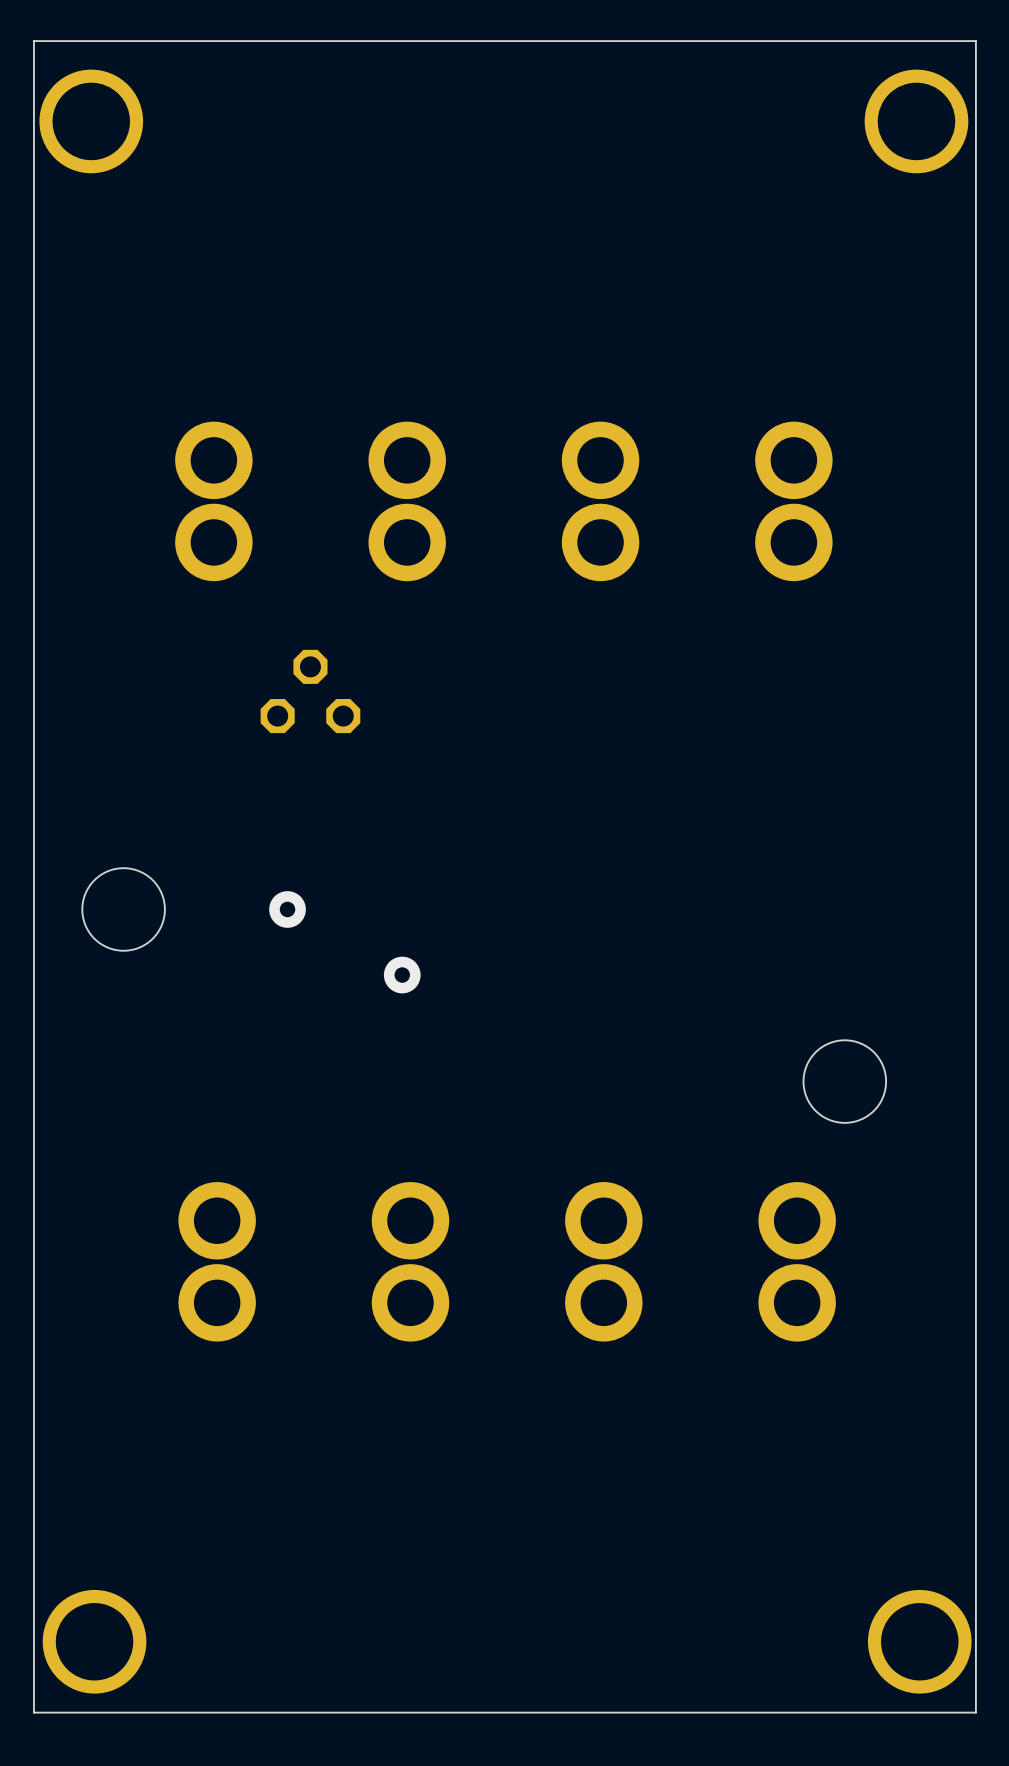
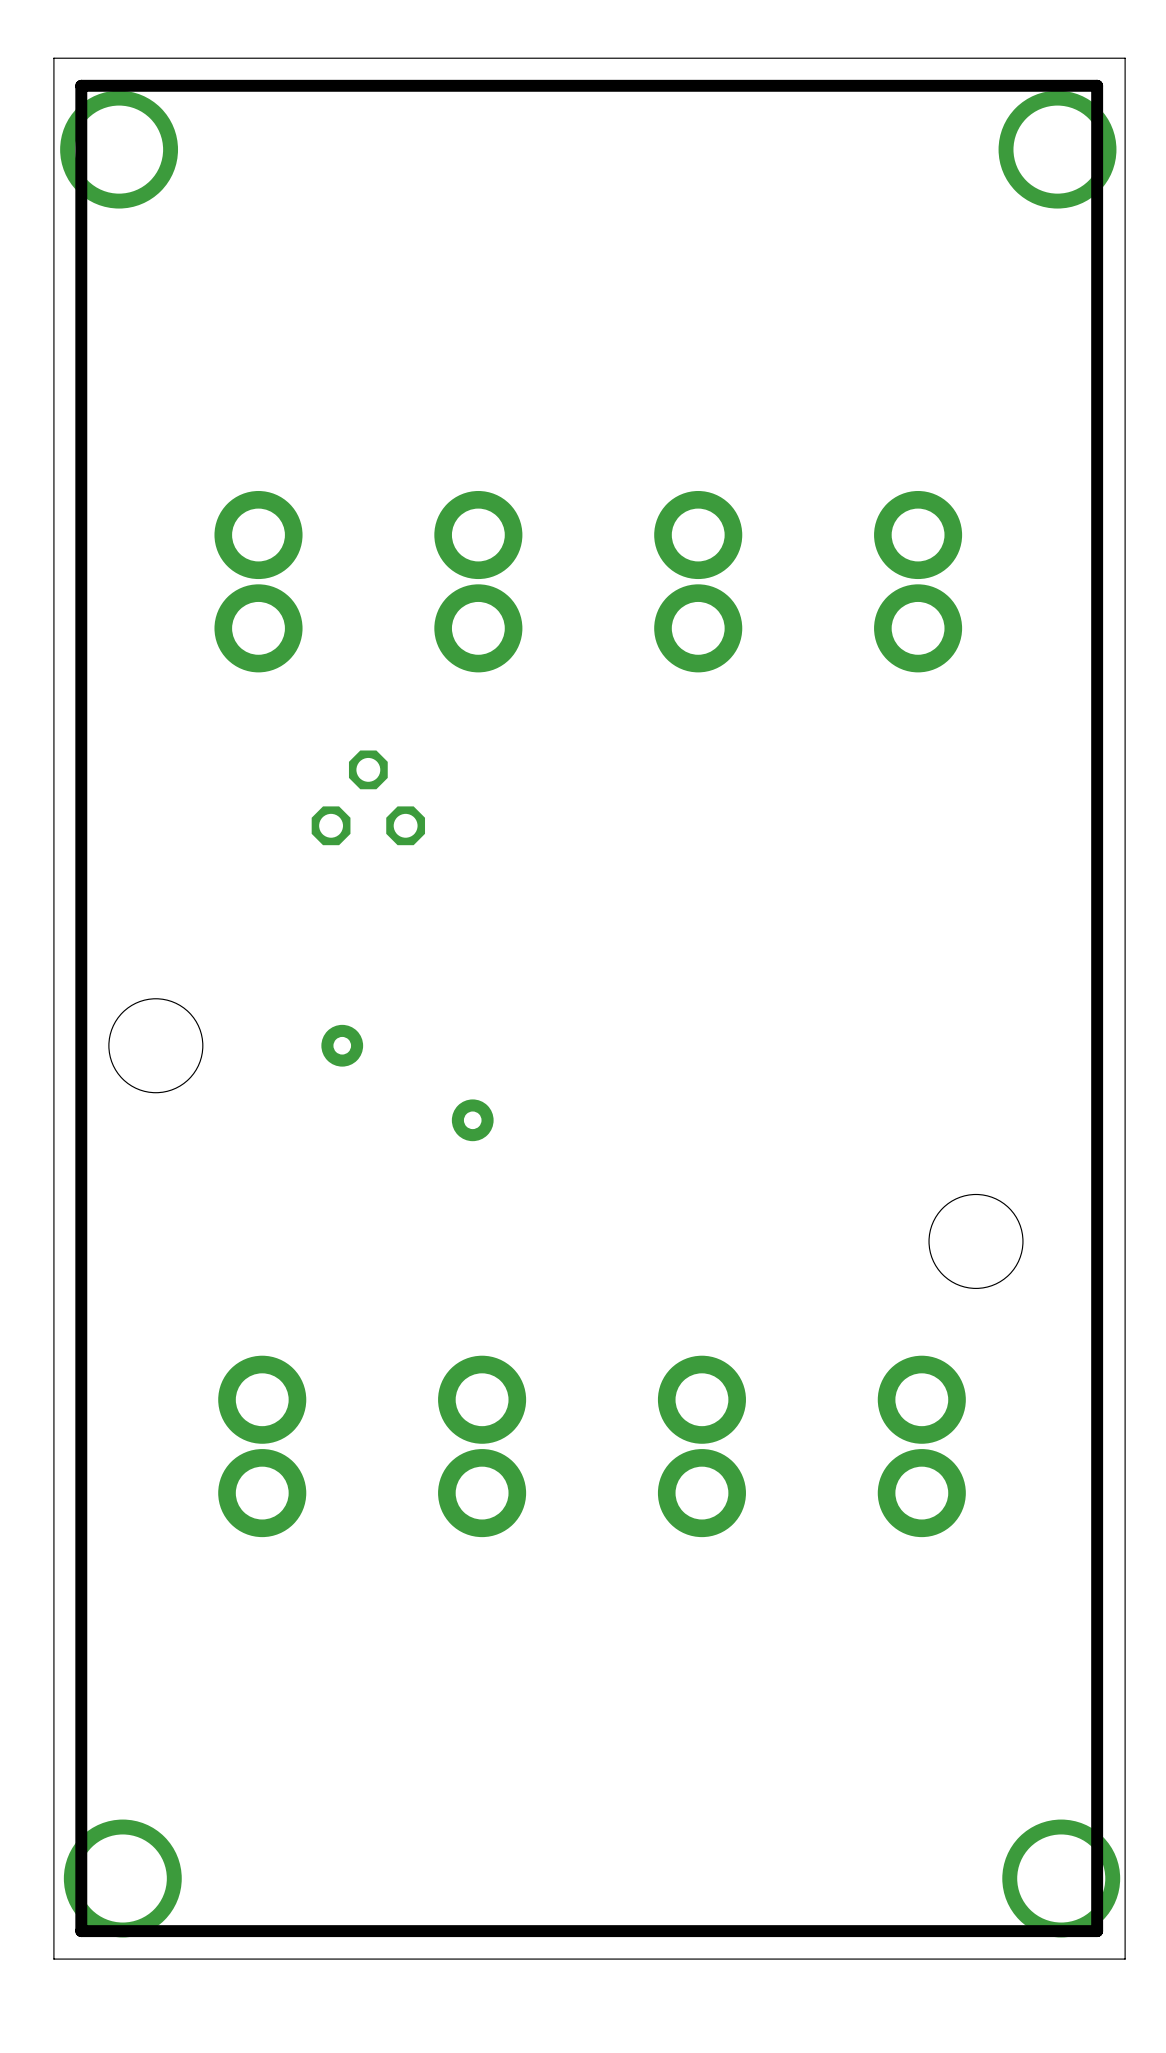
board edge: none -> (1097, 85) (81, 85) (81, 1931) (1097, 1931) (1097, 85)

